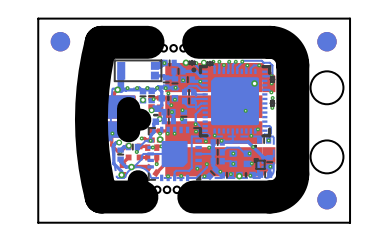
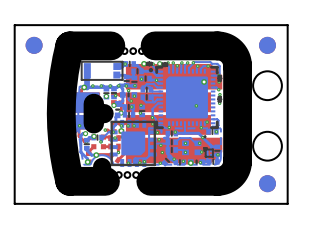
part footprint: [147, 126, 202, 182] -> [109, 119, 157, 167]
via: none -> (157, 132)
via: (205, 141) -> none
via: (209, 147) -> none
via: none -> (159, 139)
bottom track: (174, 153) (143, 153) (141, 159) (131, 167) -> none
via: none -> (160, 145)
bottom track: (206, 164) (206, 167) (196, 177) (187, 177) -> none
via: (197, 168) -> none
via: none -> (144, 161)

